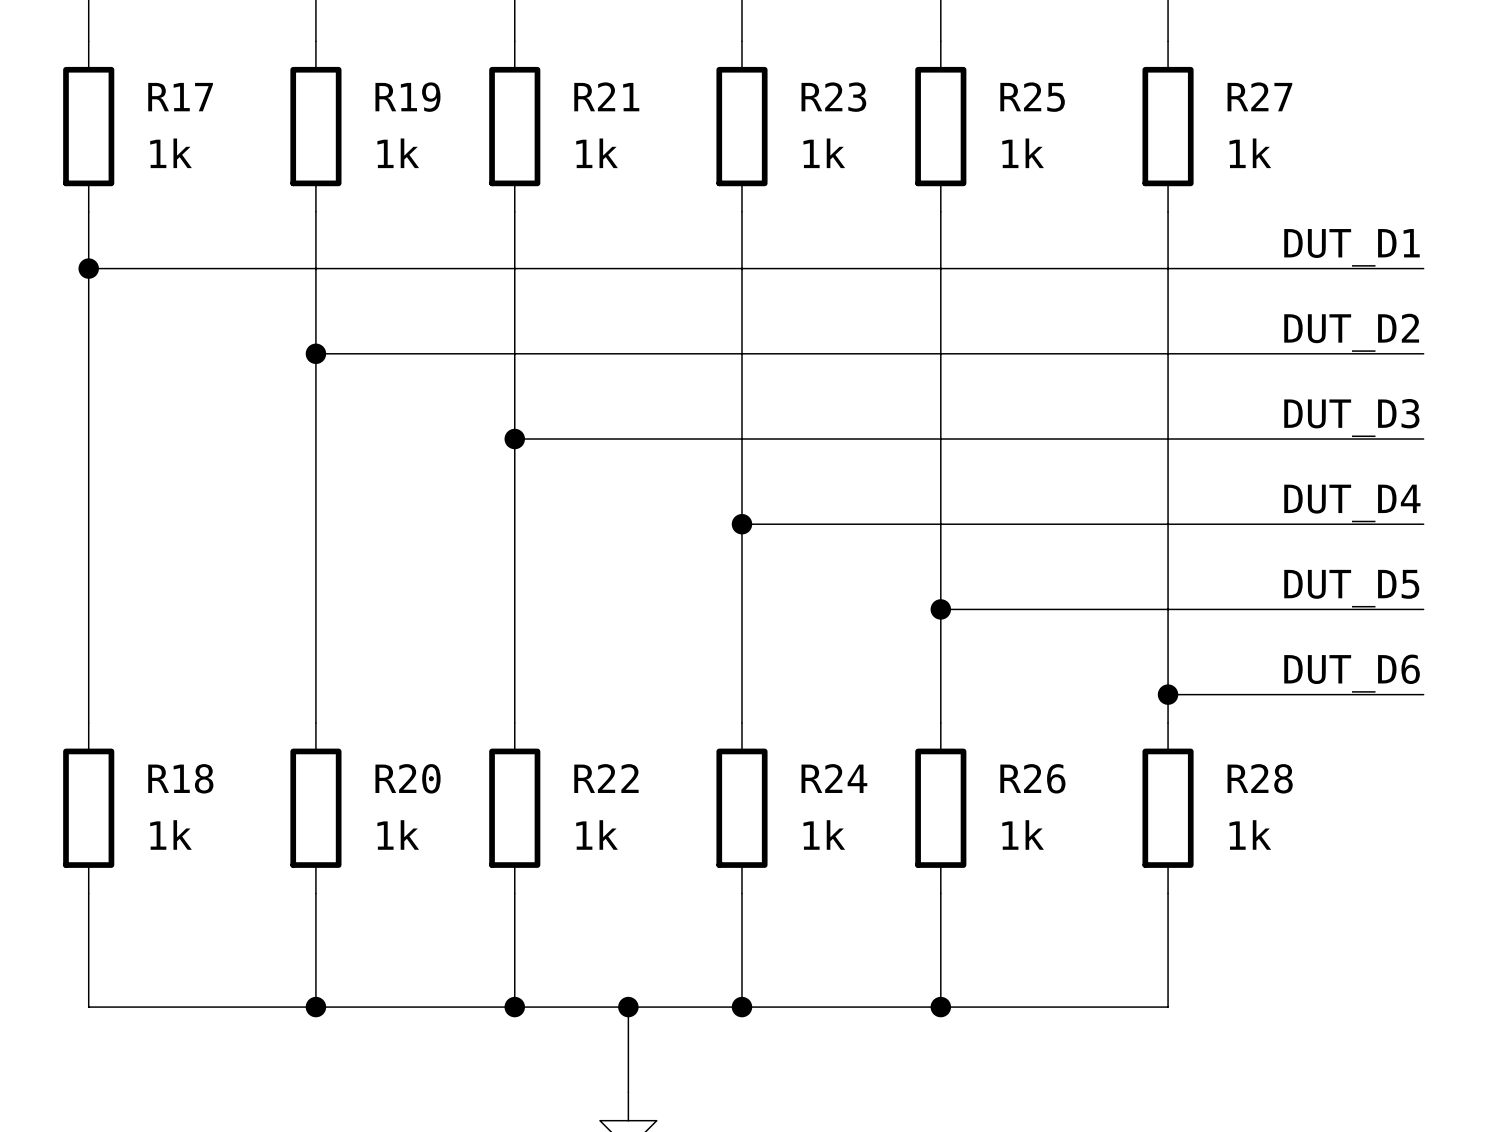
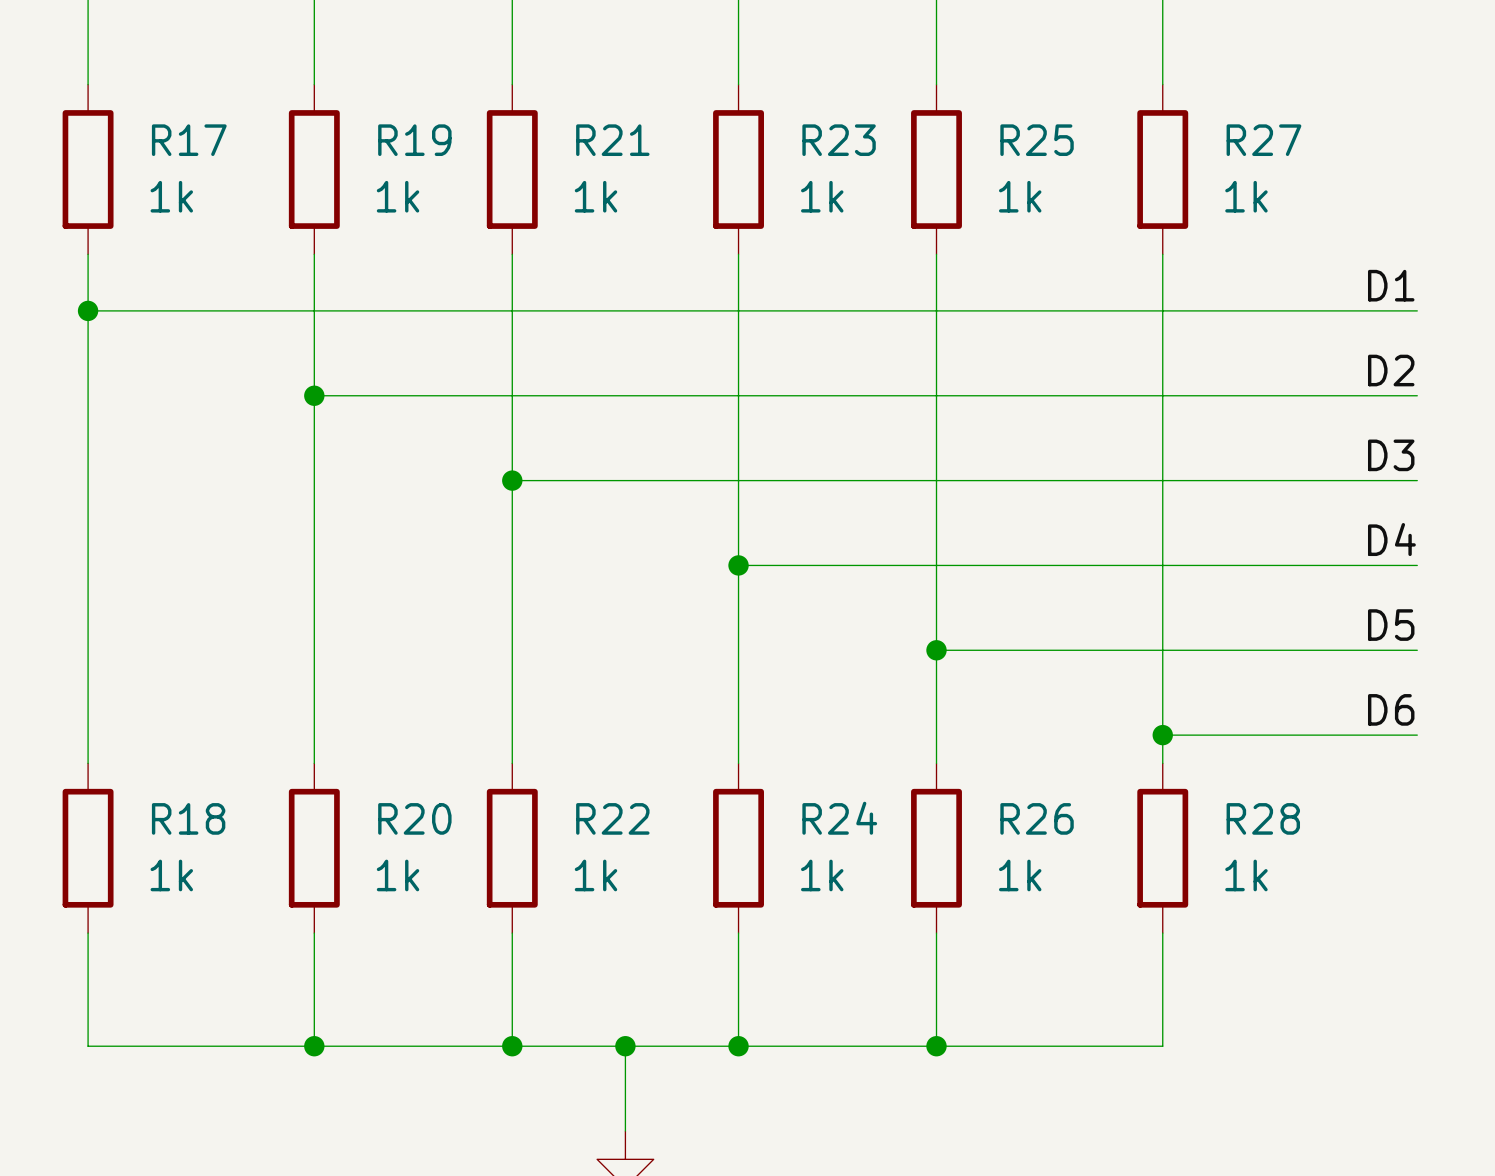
label: none -> D1 (1391, 285)
label: DUT_D1 (1352, 247) -> none
label: none -> D2 (1391, 370)
label: DUT_D2 (1351, 332) -> none
label: none -> D3 (1391, 455)
label: DUT_D3 (1351, 417) -> none
label: none -> D4 (1391, 539)
label: DUT_D4 (1352, 503) -> none
label: none -> D5 (1391, 625)
label: DUT_D5 (1351, 588) -> none
label: none -> D6 (1391, 709)
label: DUT_D6 (1352, 673) -> none

